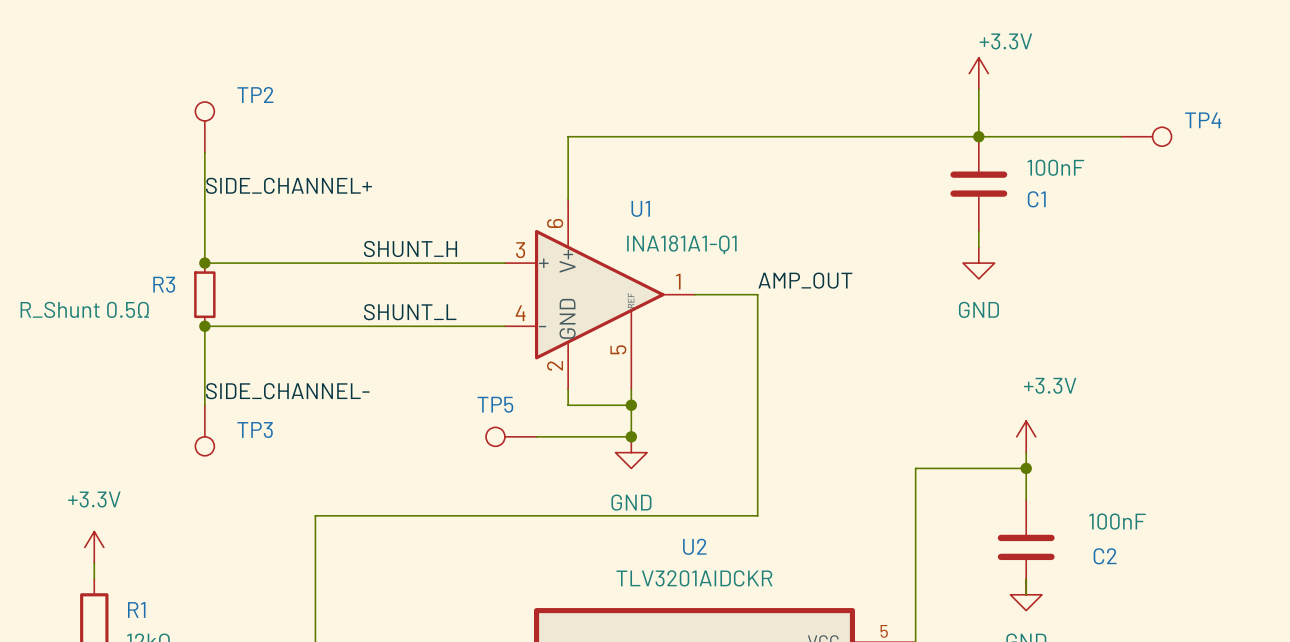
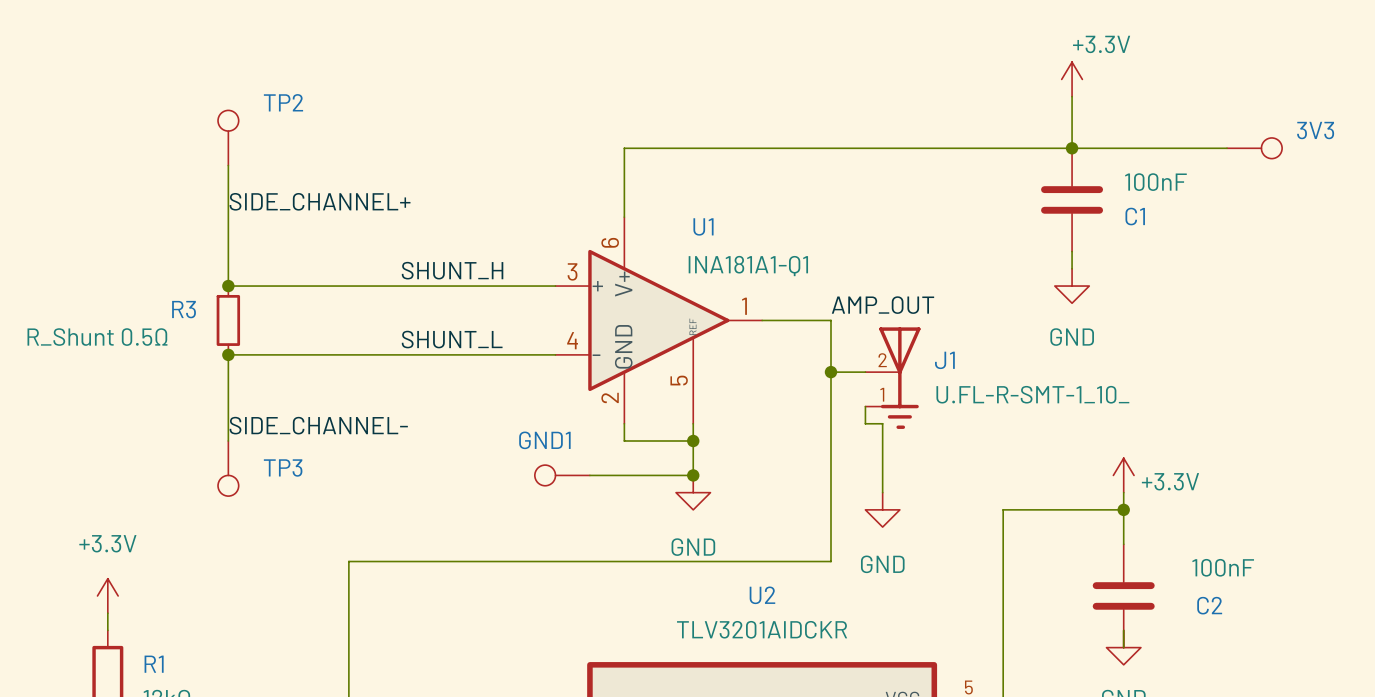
TP4 name: TP4 (1203, 120) -> 3V3 (1315, 130)
wire: none -> (830, 372) (865, 372)
junction: none -> (830, 372)
J1: none -> U.FL-R-SMT-1_10_ (892, 378)
wire: none -> (865, 406) (865, 423) (882, 423) (882, 492)
power symbol text position: +3.3V (1050, 385) -> +3.3V (1170, 481)
TP5 name: TP5 (495, 404) -> GND1 (544, 440)
power symbol: none -> GND (882, 509)

